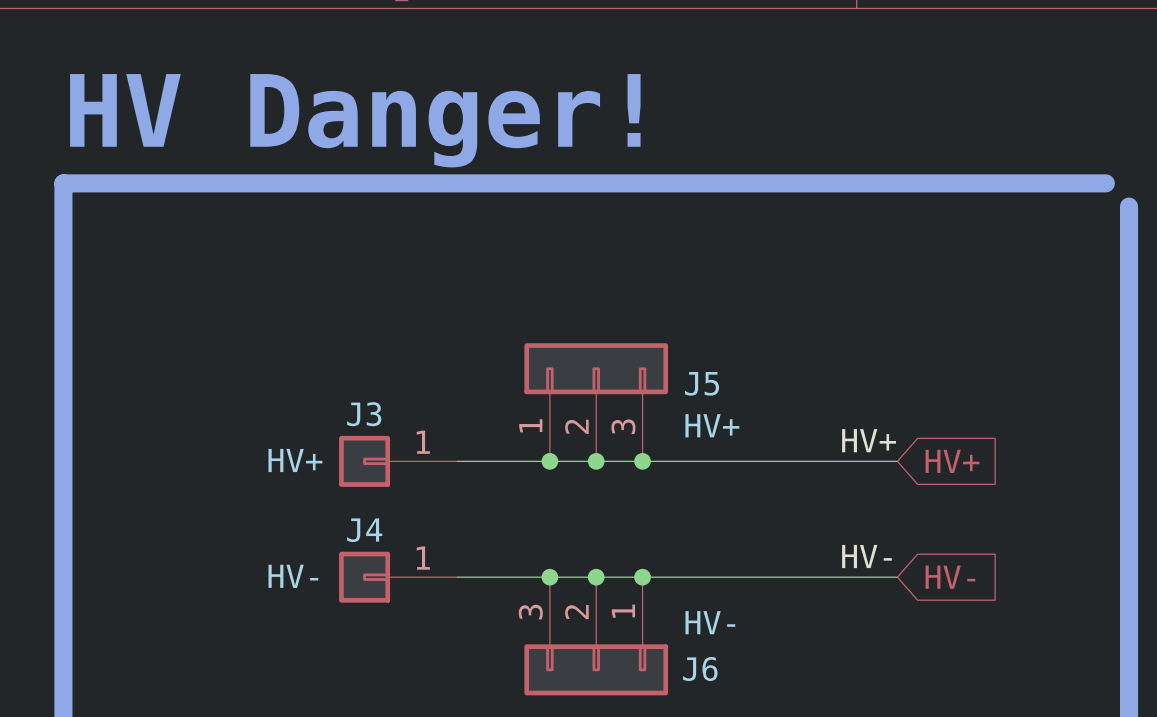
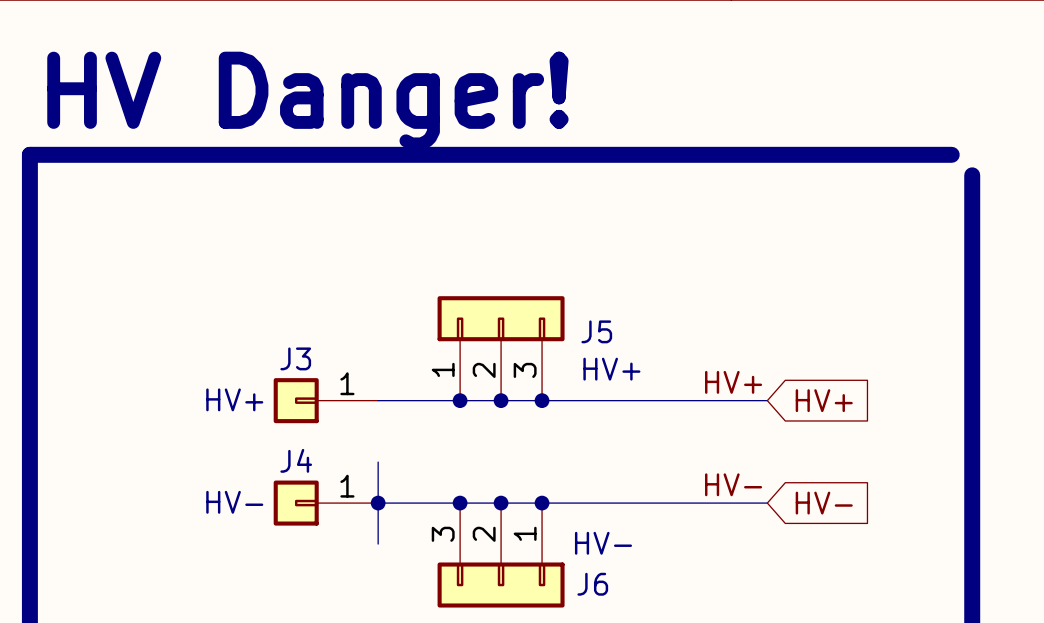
wire: none -> (378, 462) (378, 544)
junction: none -> (378, 503)

